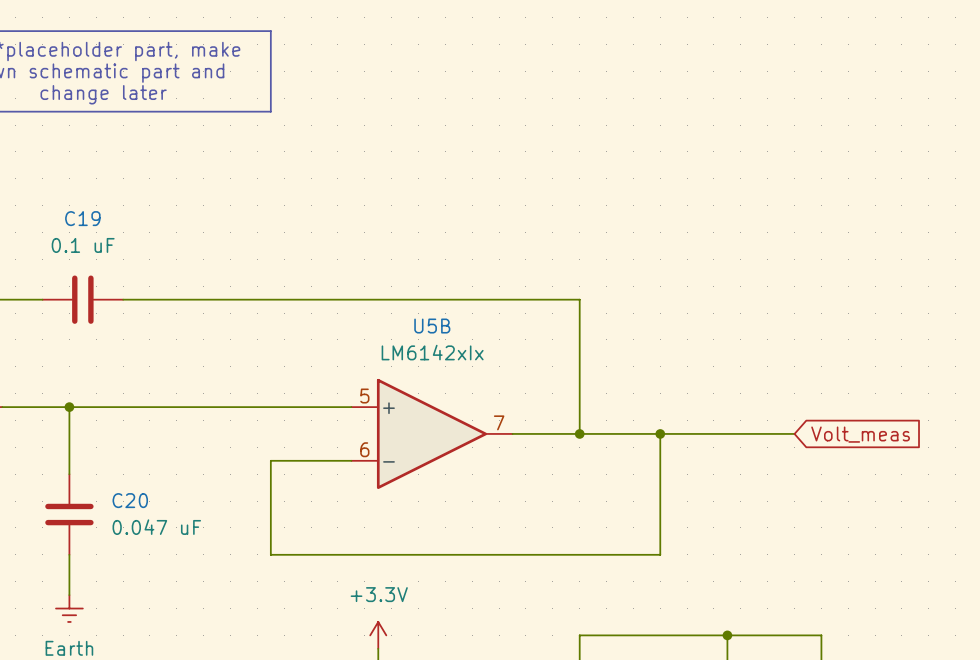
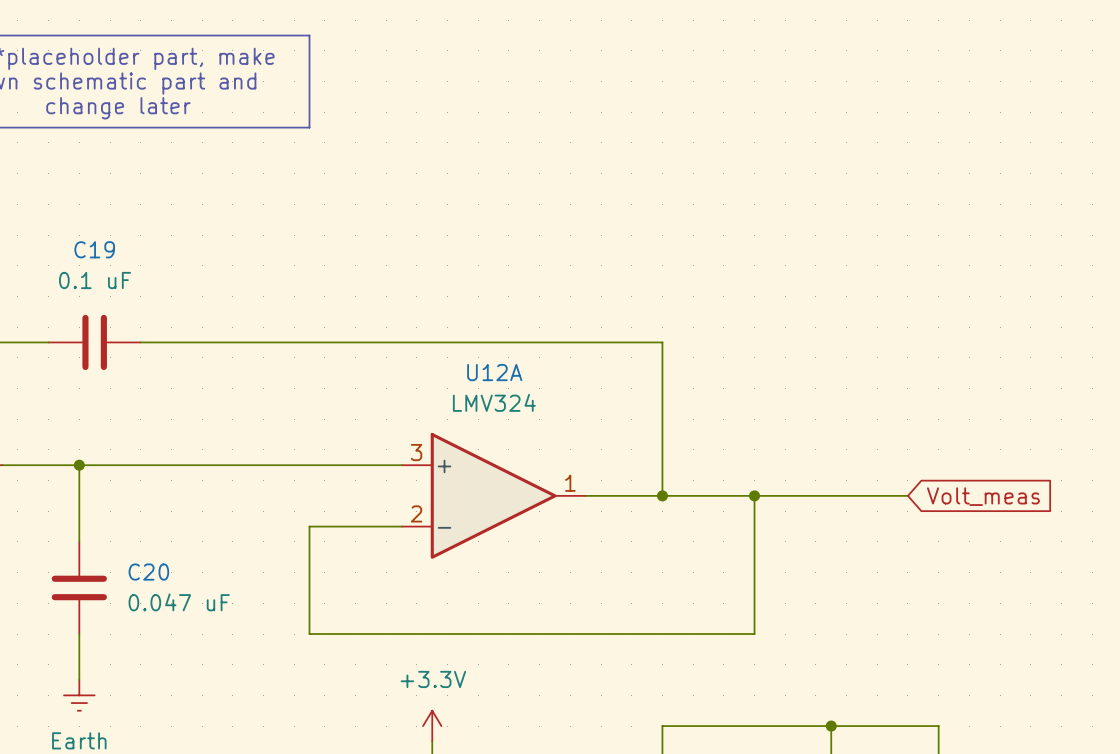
U5B name: U5B (432, 326) -> U12A (494, 372)
U5B value: LM6142xIx (432, 352) -> LMV324 (494, 402)
U5B pin number: 5 (364, 396) -> 3 (416, 452)
U5B pin number: 7 (499, 422) -> 1 (570, 483)
U5B pin number: 6 (364, 449) -> 2 (416, 513)

